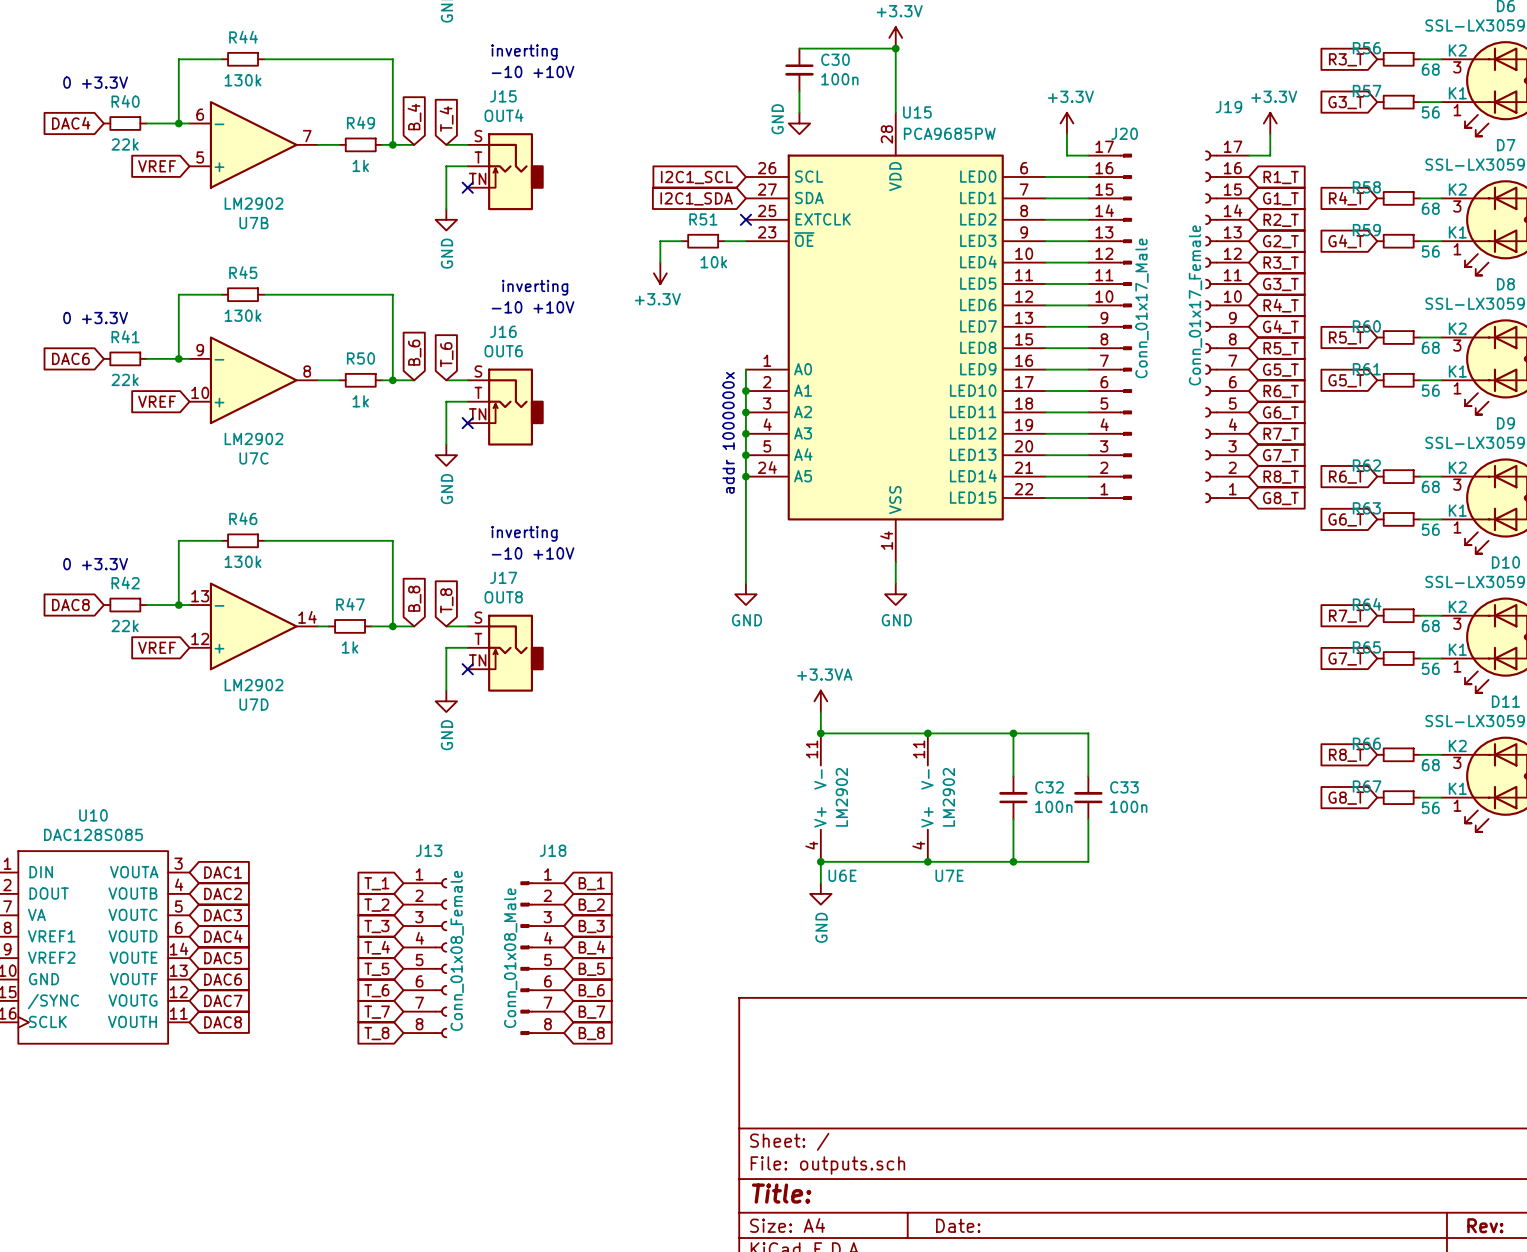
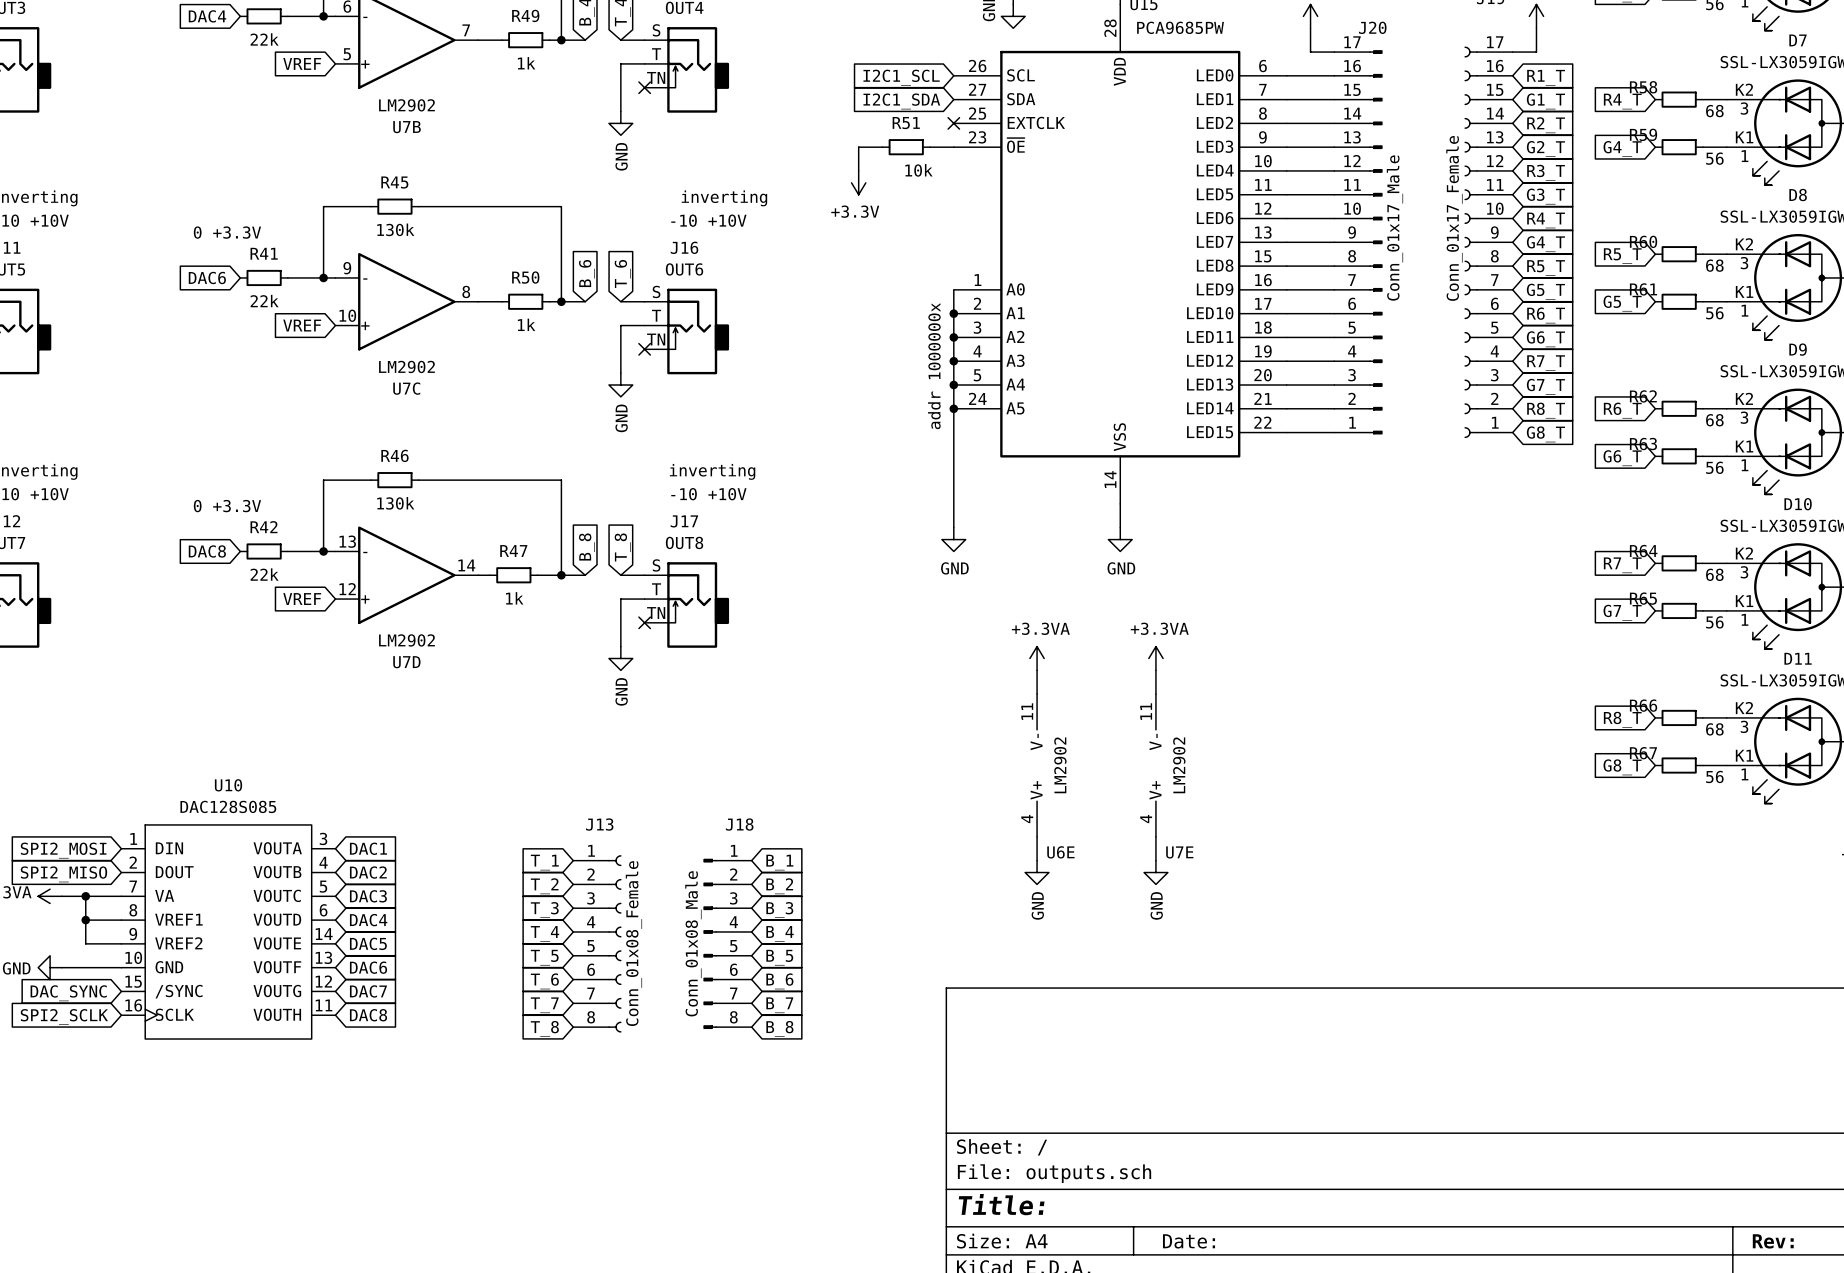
power symbol: none -> +3.3VA (1155, 658)
wire: none -> (1155, 670) (1155, 694)
wire: (820, 733) (1088, 733) (1088, 776) -> none
junction: (820, 733) -> none
junction: (927, 733) -> none
wire: (1013, 733) (1013, 776) -> none
junction: (1013, 733) -> none
C32: 100n (1013, 797) -> none
C33: 100n (1088, 797) -> none
wire: (1013, 819) (1013, 861) -> none
wire: (1088, 819) (1088, 861) (820, 861) -> none
junction: (820, 861) -> none
wire: none -> (1155, 836) (1155, 860)
junction: (927, 861) -> none
junction: (1013, 861) -> none
power symbol: none -> GND (1155, 872)

